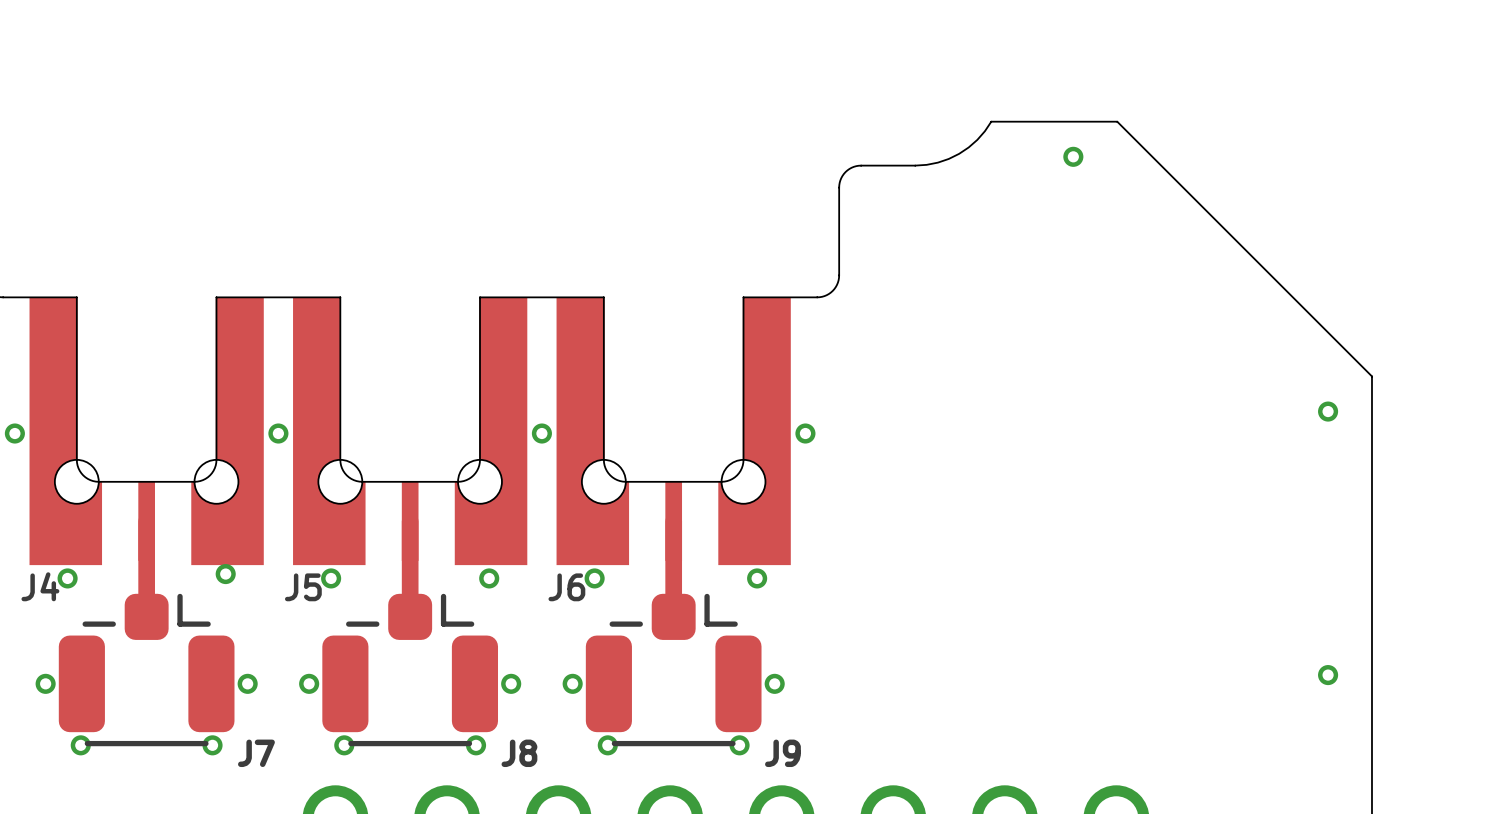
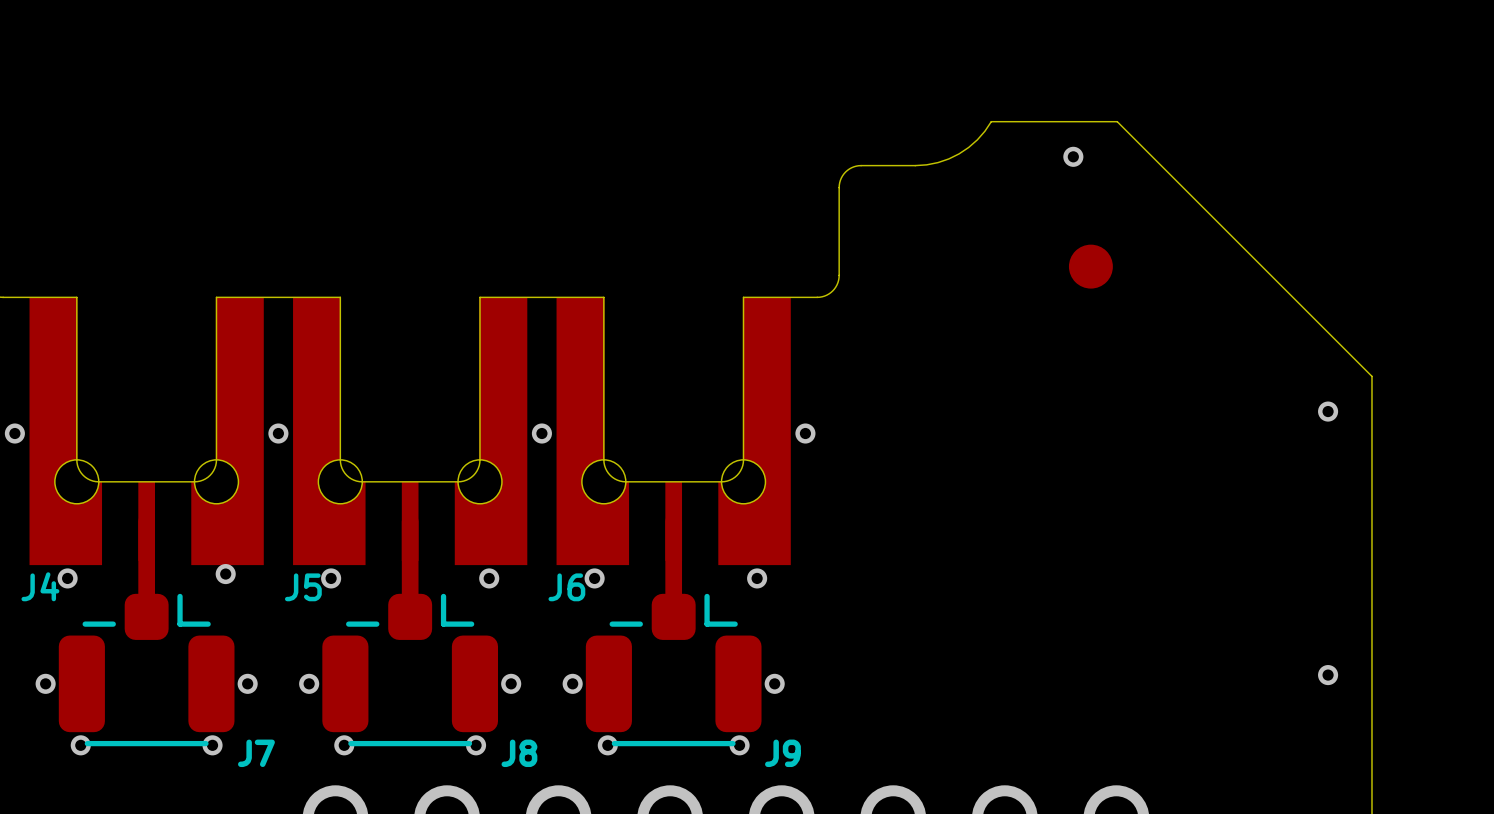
part: none -> (1090, 266)

